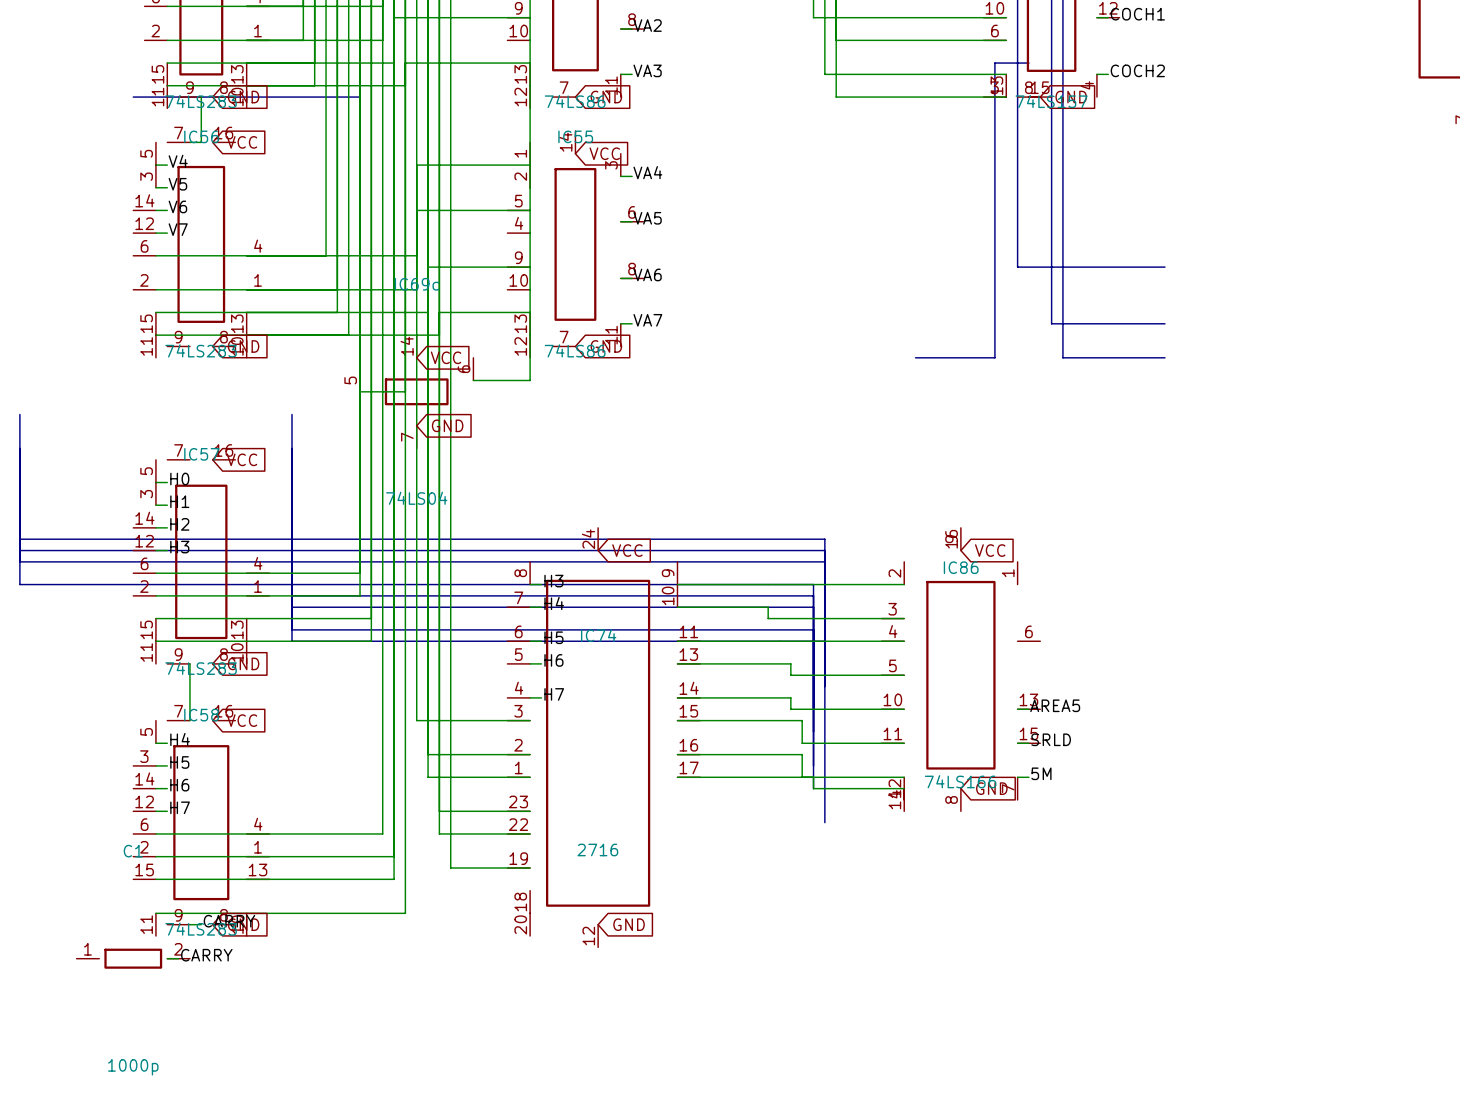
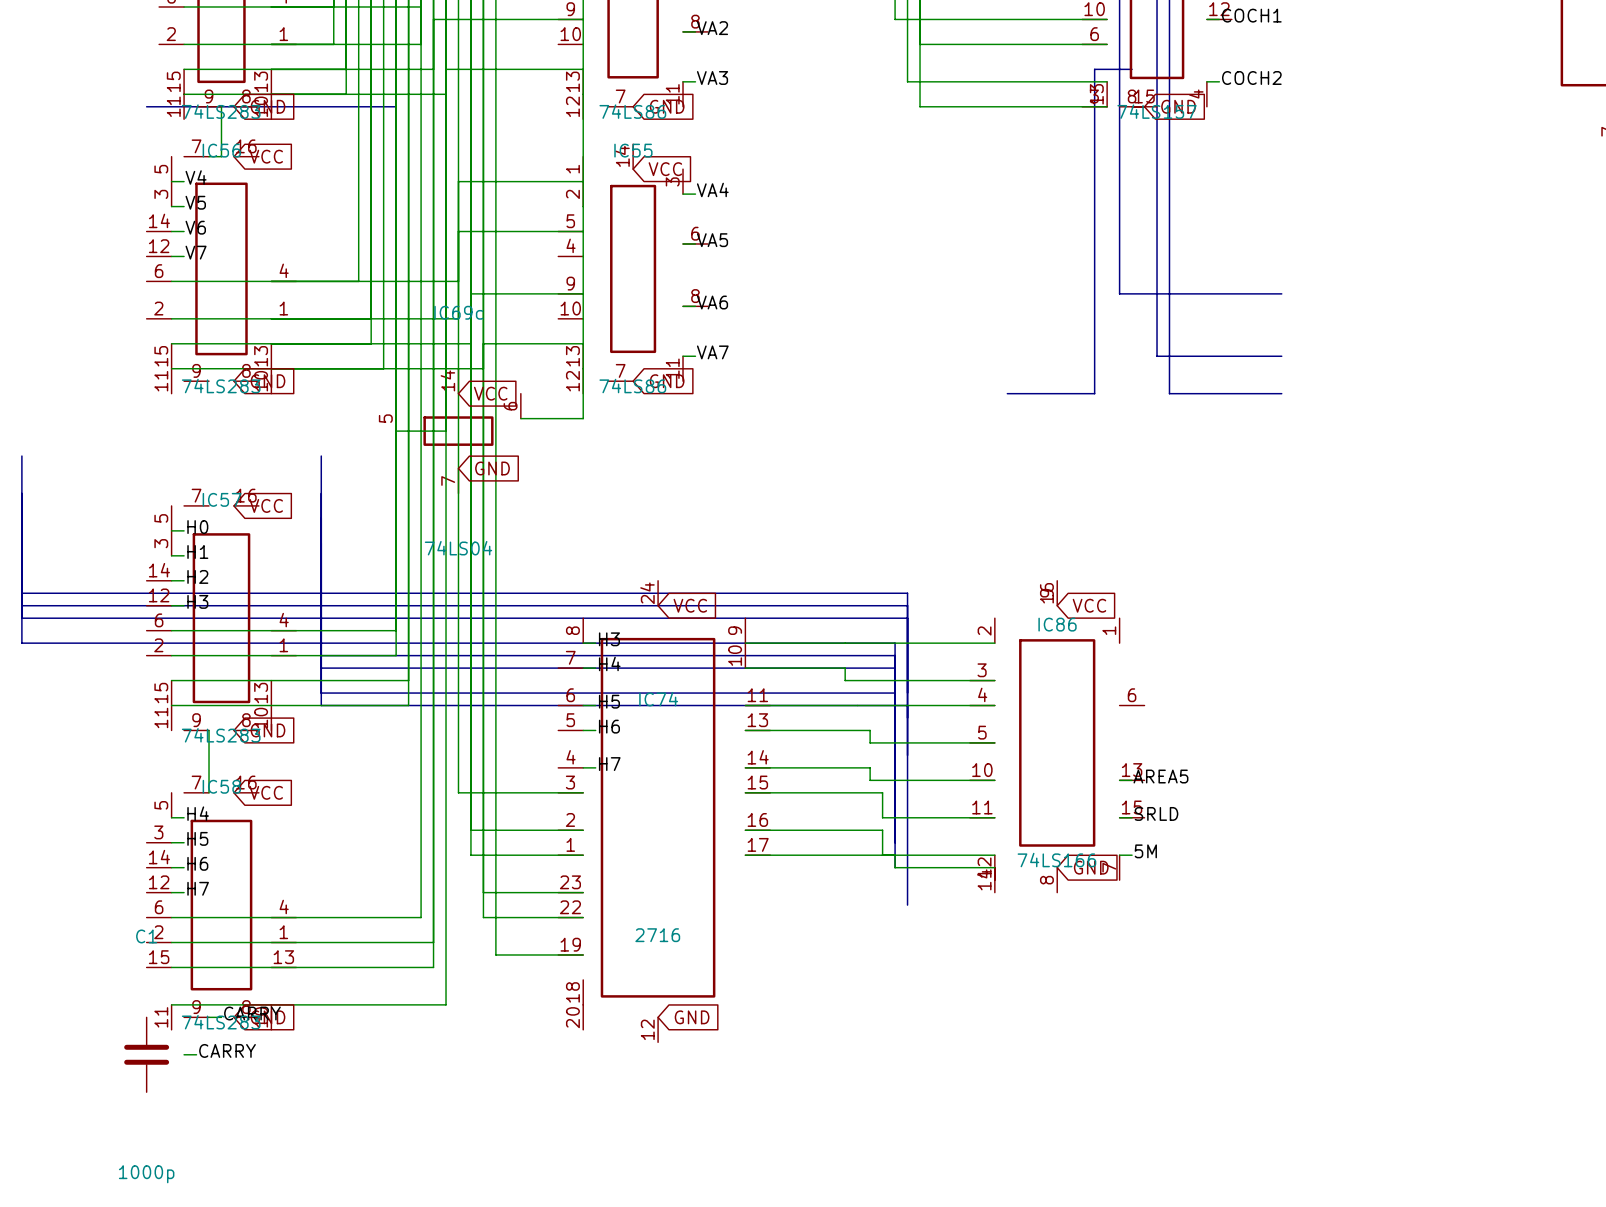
C1 symbol: [76, 948, 190, 969] -> [124, 1017, 170, 1093]

